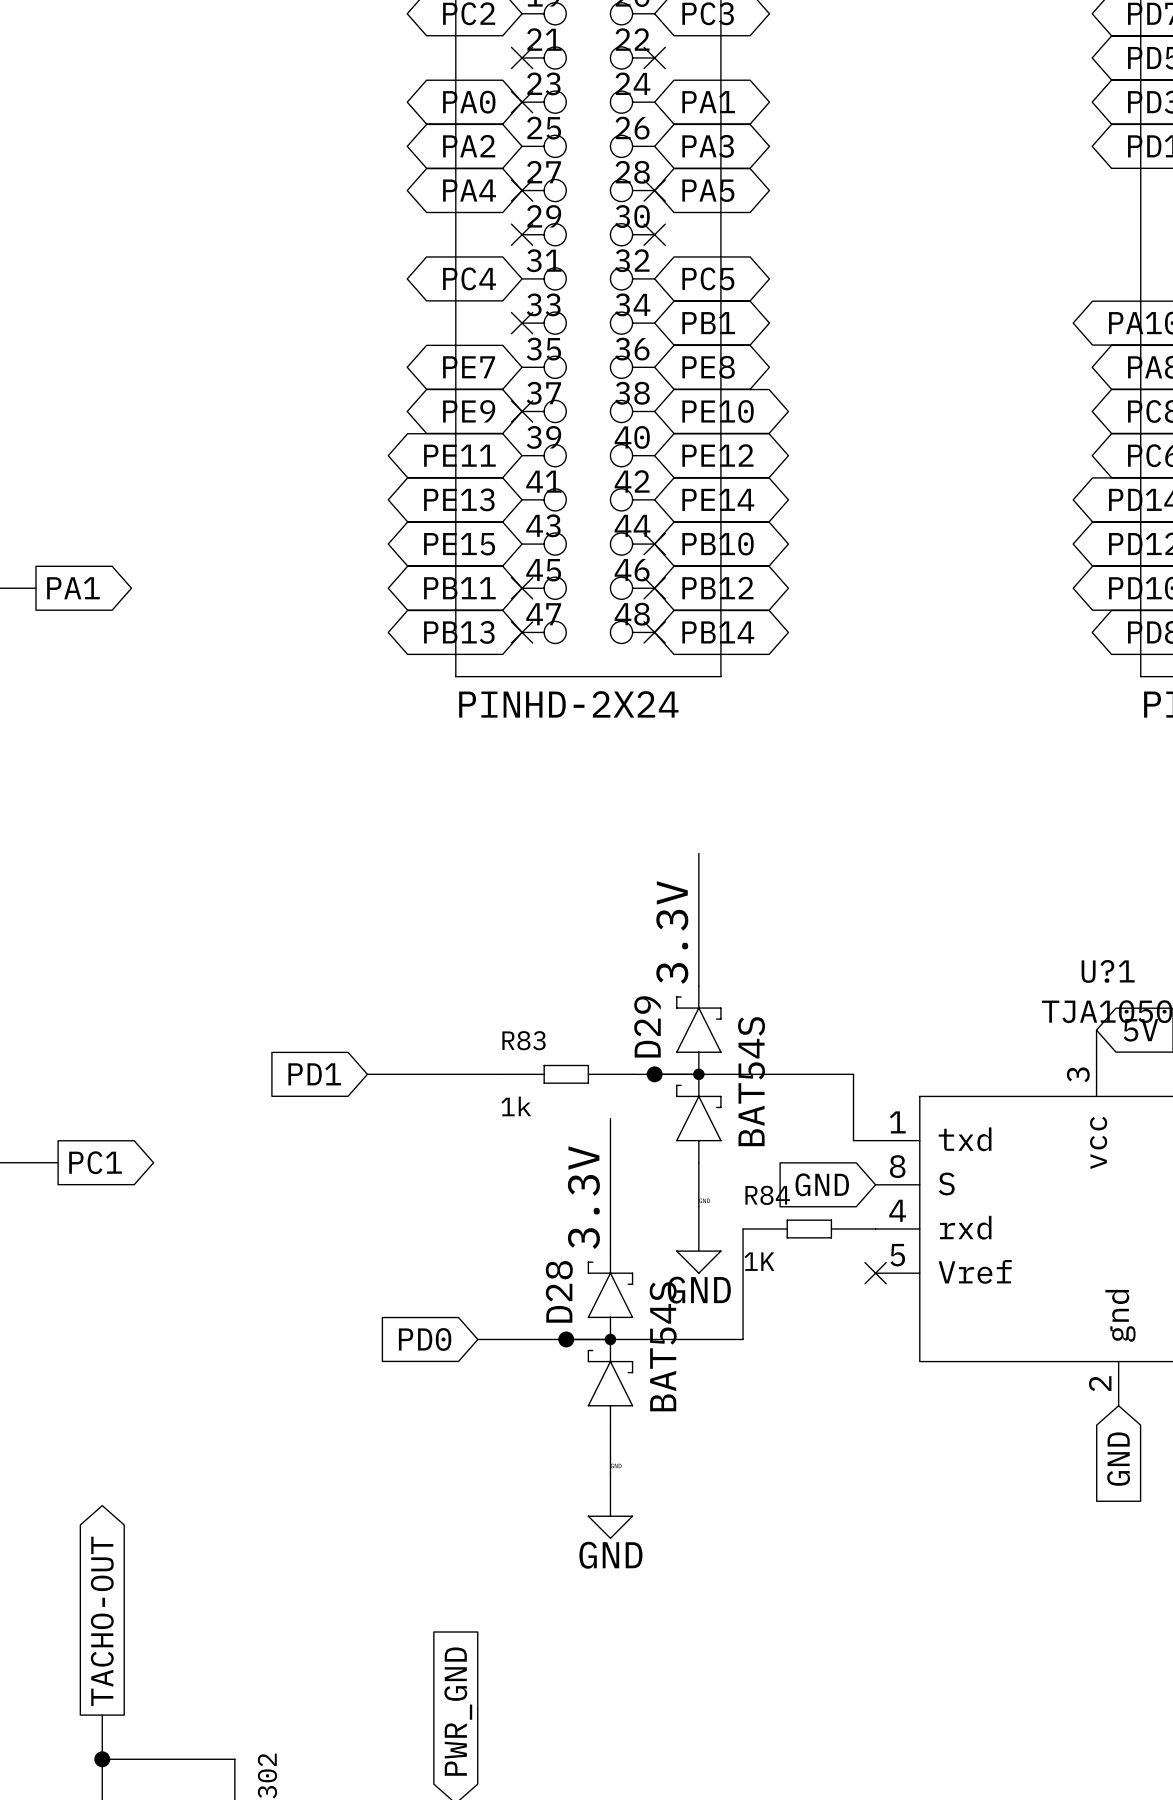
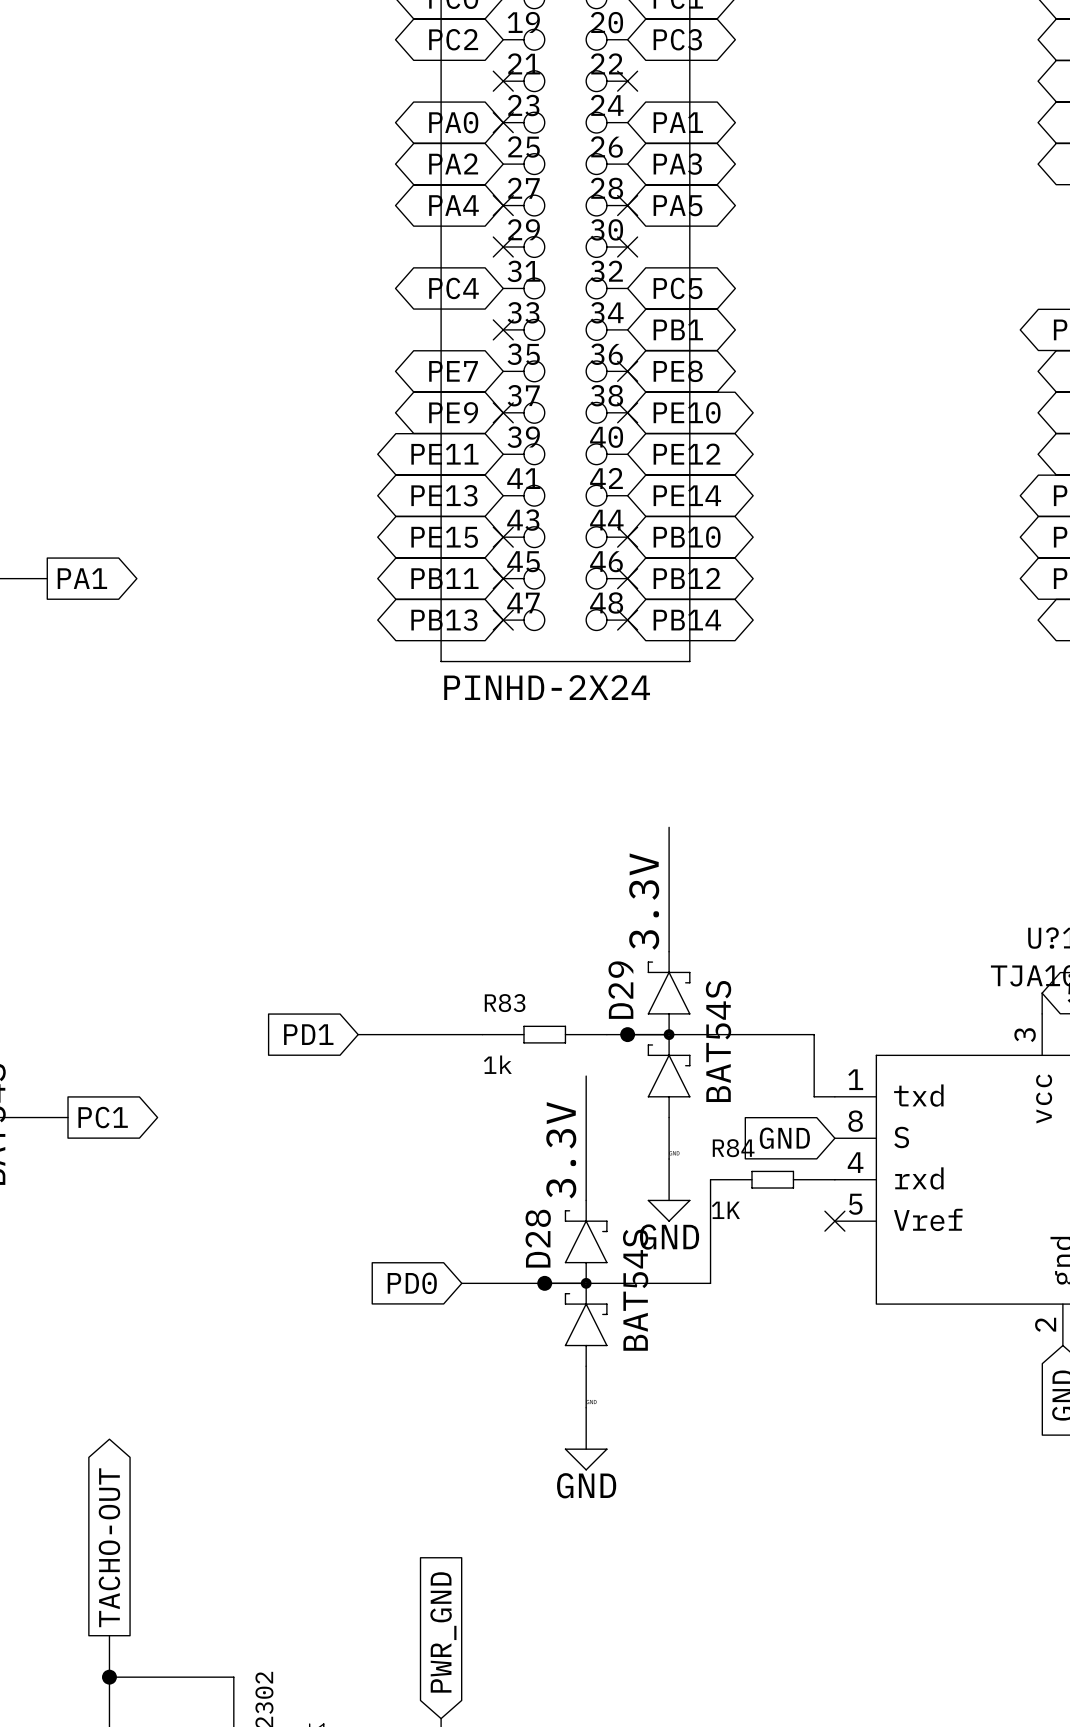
no-connect mark: none -> (627, 371)
no-connect mark: none -> (627, 412)
no-connect mark: none -> (503, 537)

